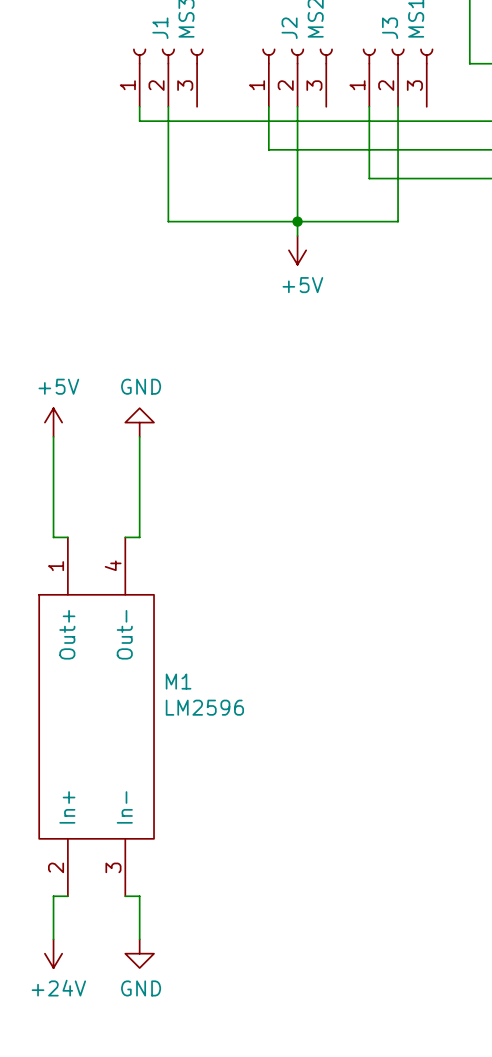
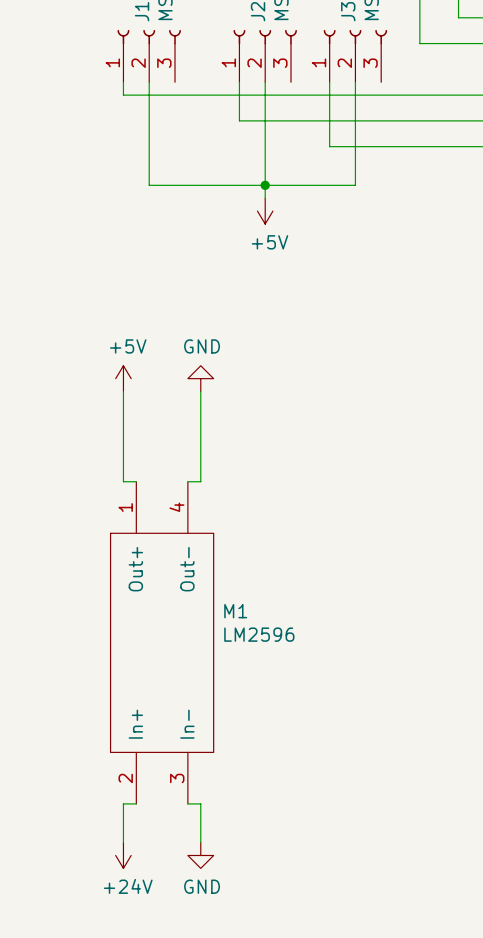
power symbol position: +5V (53, 422) -> +5V (123, 378)
power symbol position: GND (139, 422) -> GND (200, 378)
wire: (53, 436) (53, 537) (67, 537) -> none
wire: none -> (200, 391) (200, 481) (187, 481)
wire: (125, 537) (139, 537) -> (136, 481) (123, 481) (123, 468)
M1 position: (96, 716) -> (162, 642)
wire: (67, 896) (53, 896) (53, 939) -> none
wire: (125, 896) (139, 896) (139, 910) -> (136, 803) (123, 803)
wire: none -> (187, 803) (200, 803) (200, 842)
power symbol position: +24V (53, 953) -> +24V (123, 855)
power symbol position: GND (139, 953) -> GND (200, 855)

